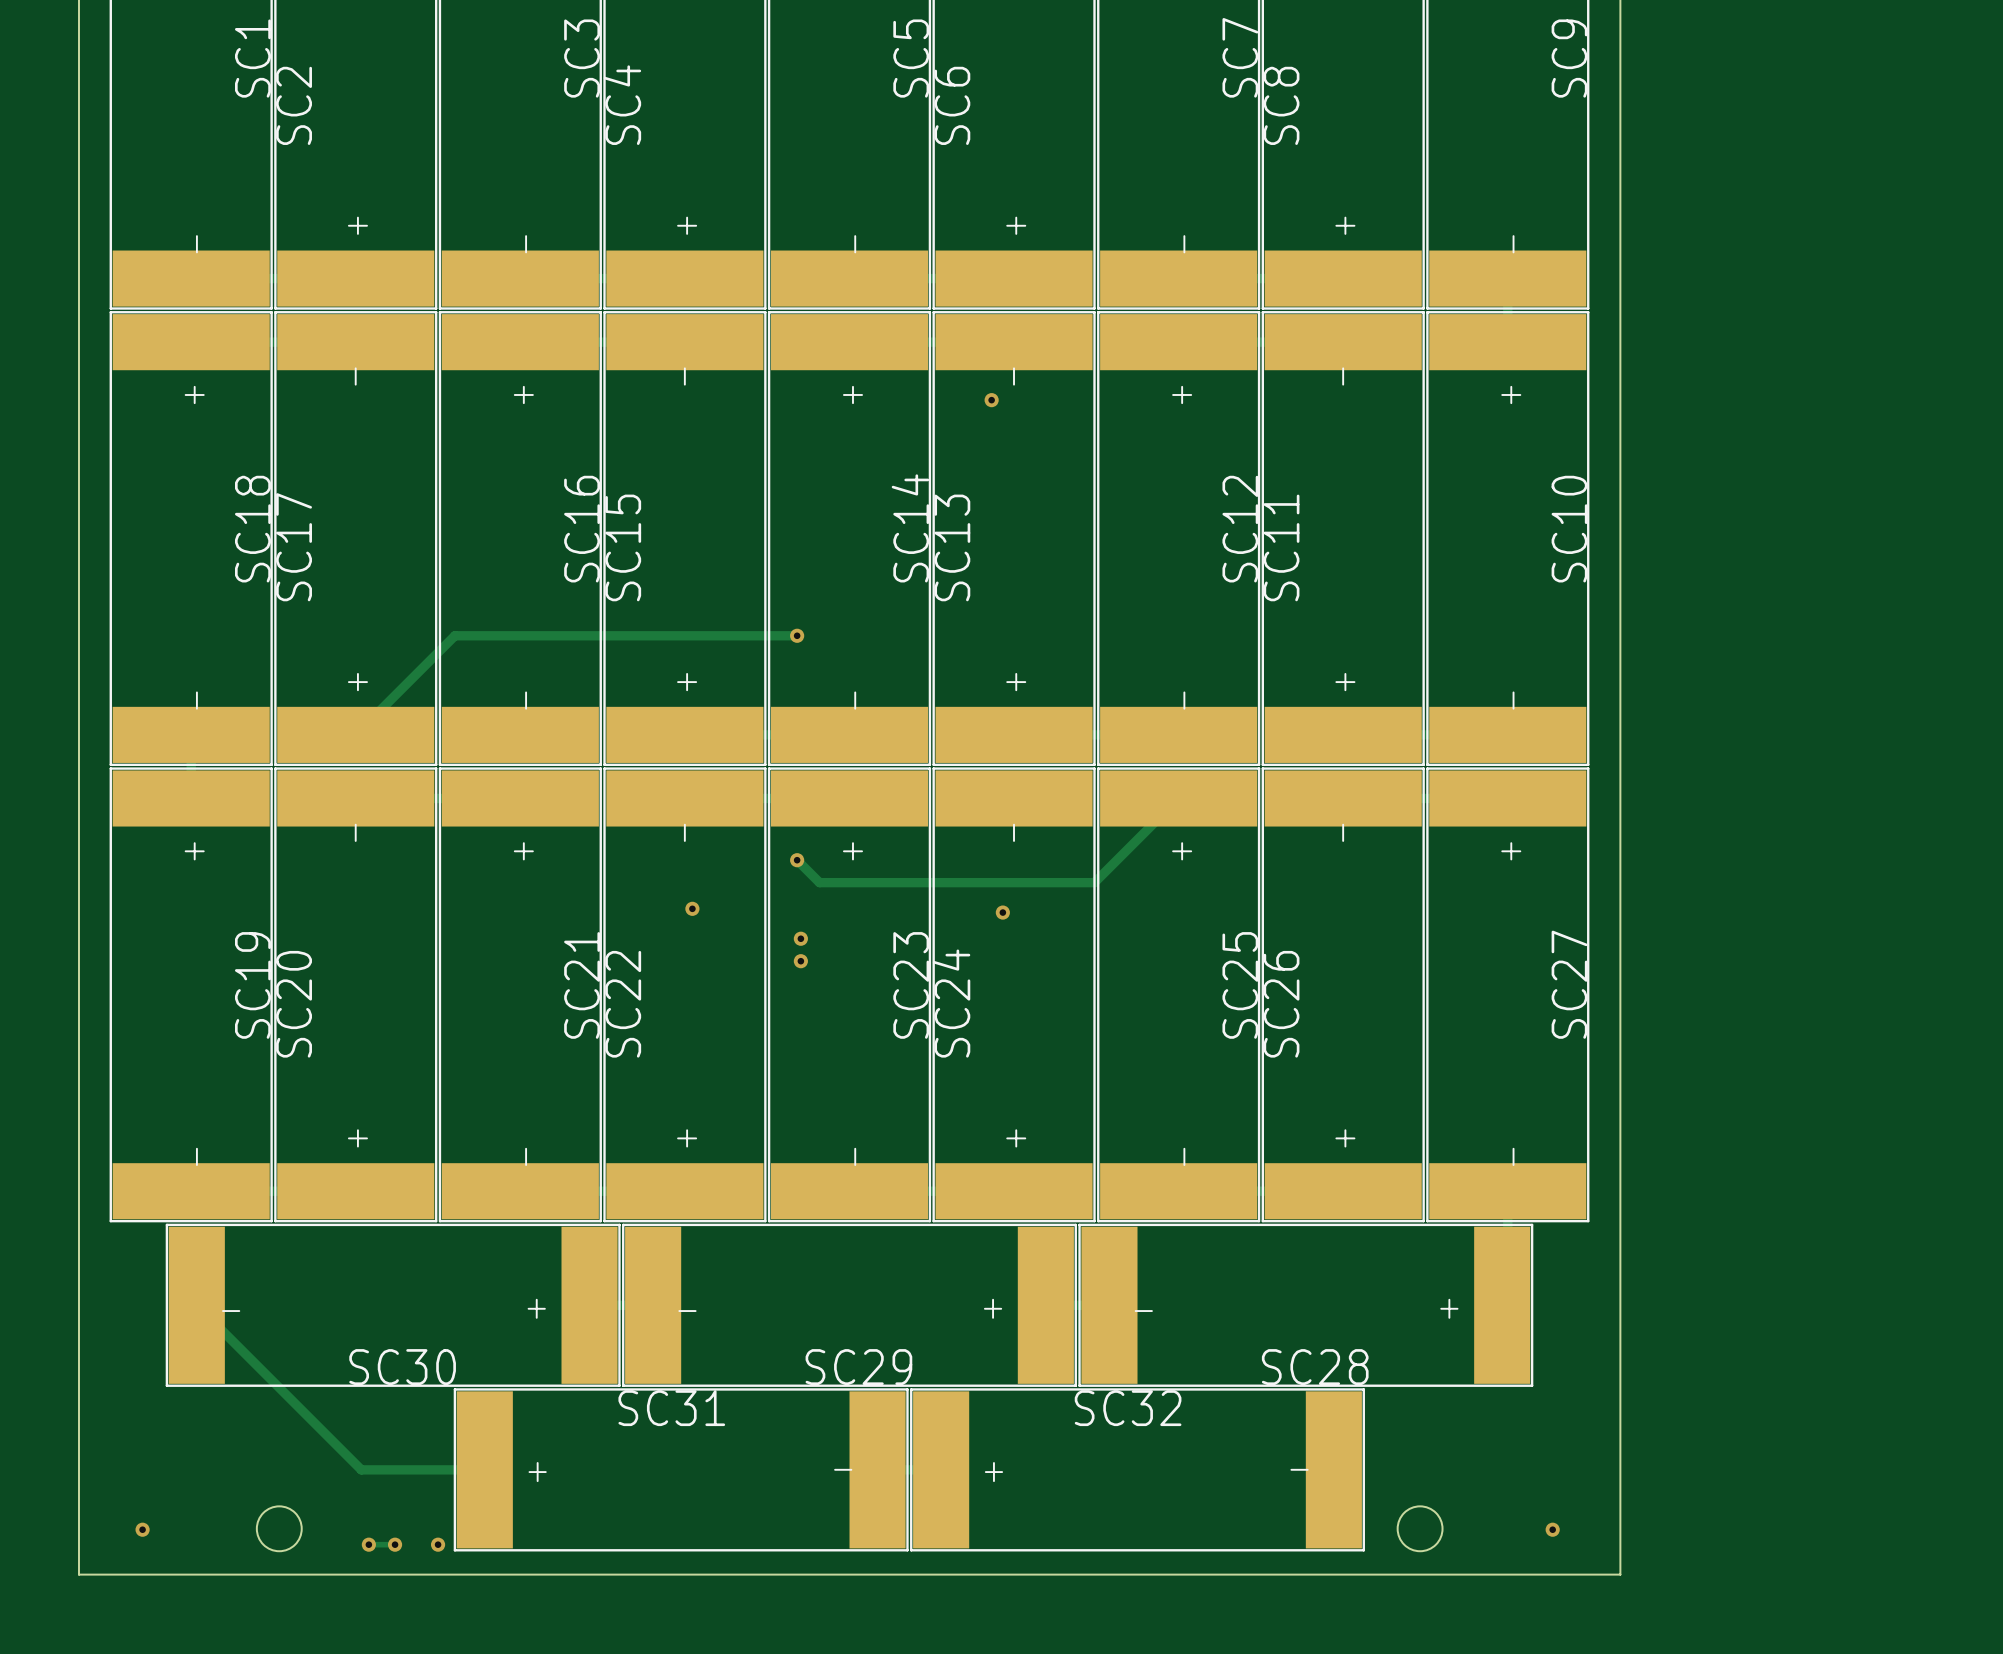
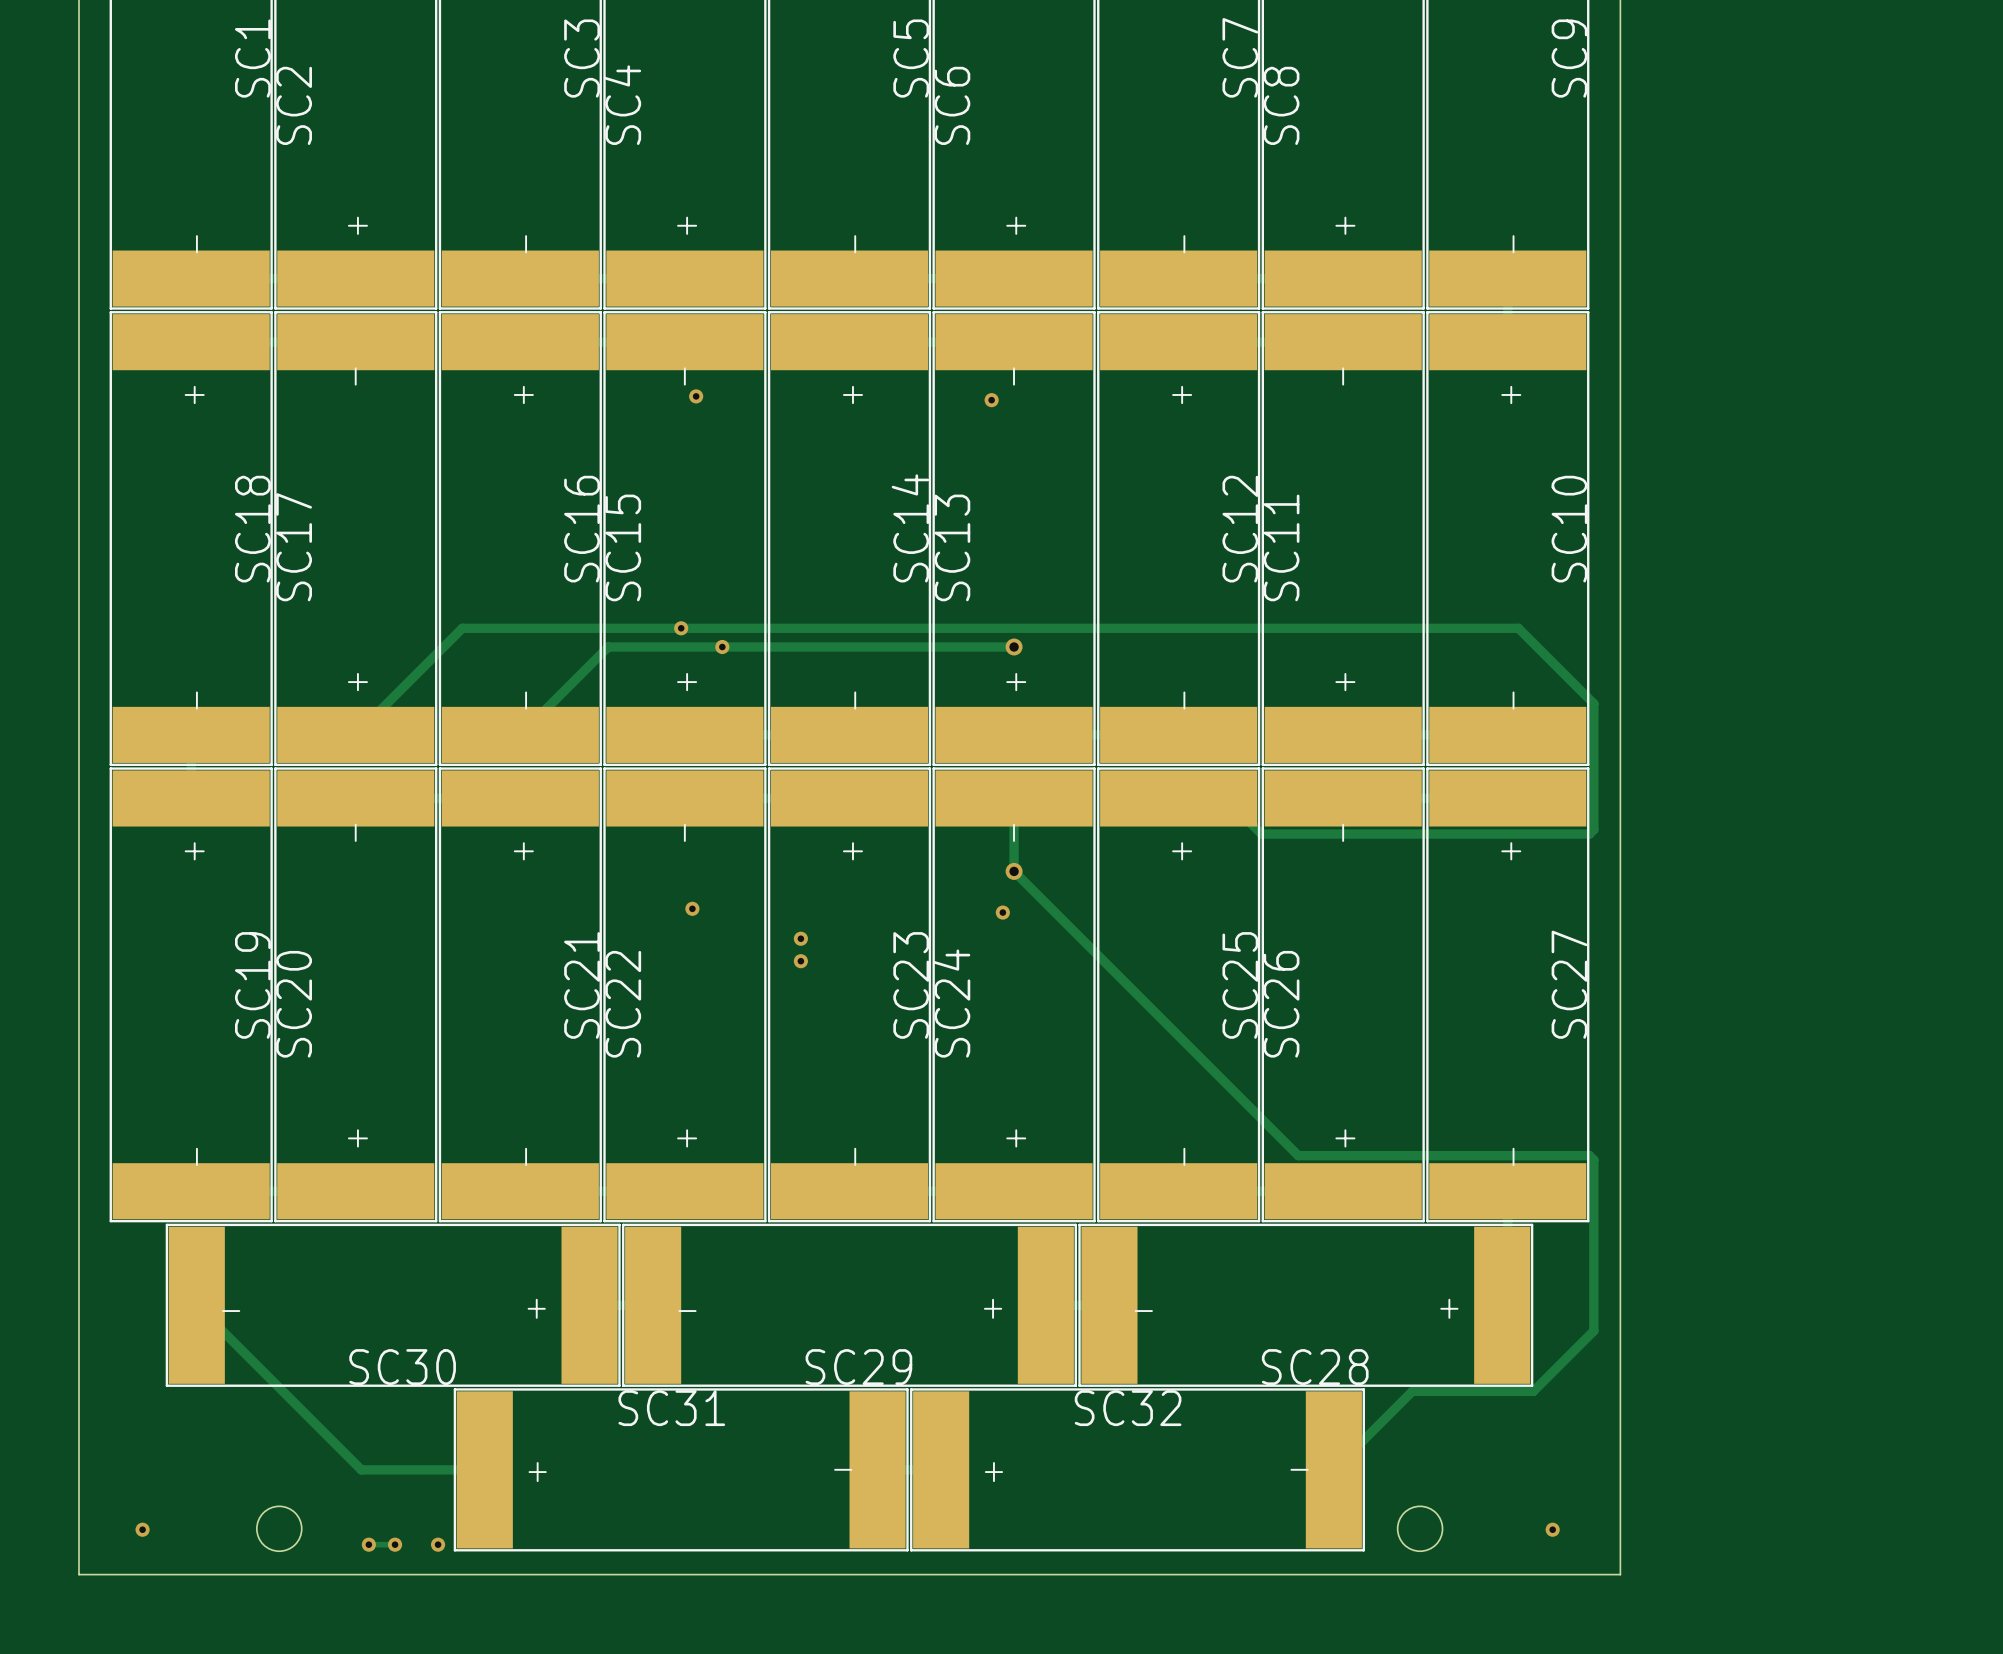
via: none -> (696, 396)
via: none -> (681, 628)
track: (454, 635) (797, 635) -> none
via: (797, 635) -> none
via: none -> (722, 647)
track: none -> (1014, 647) (608, 647) (520, 734)
via: none -> (1014, 647)
track: none -> (1014, 798) (1014, 871) (1298, 1155) (1589, 1155) (1593, 1160) (1593, 1330) (1533, 1391) (1412, 1391) (1333, 1469)
track: (1178, 798) (1094, 882) (819, 882) (797, 860) -> (1178, 798) (1225, 798) (1261, 834) (1589, 834) (1593, 829) (1593, 703) (1518, 628) (462, 628) (454, 635)
via: (797, 860) -> none
via: none -> (1014, 871)

